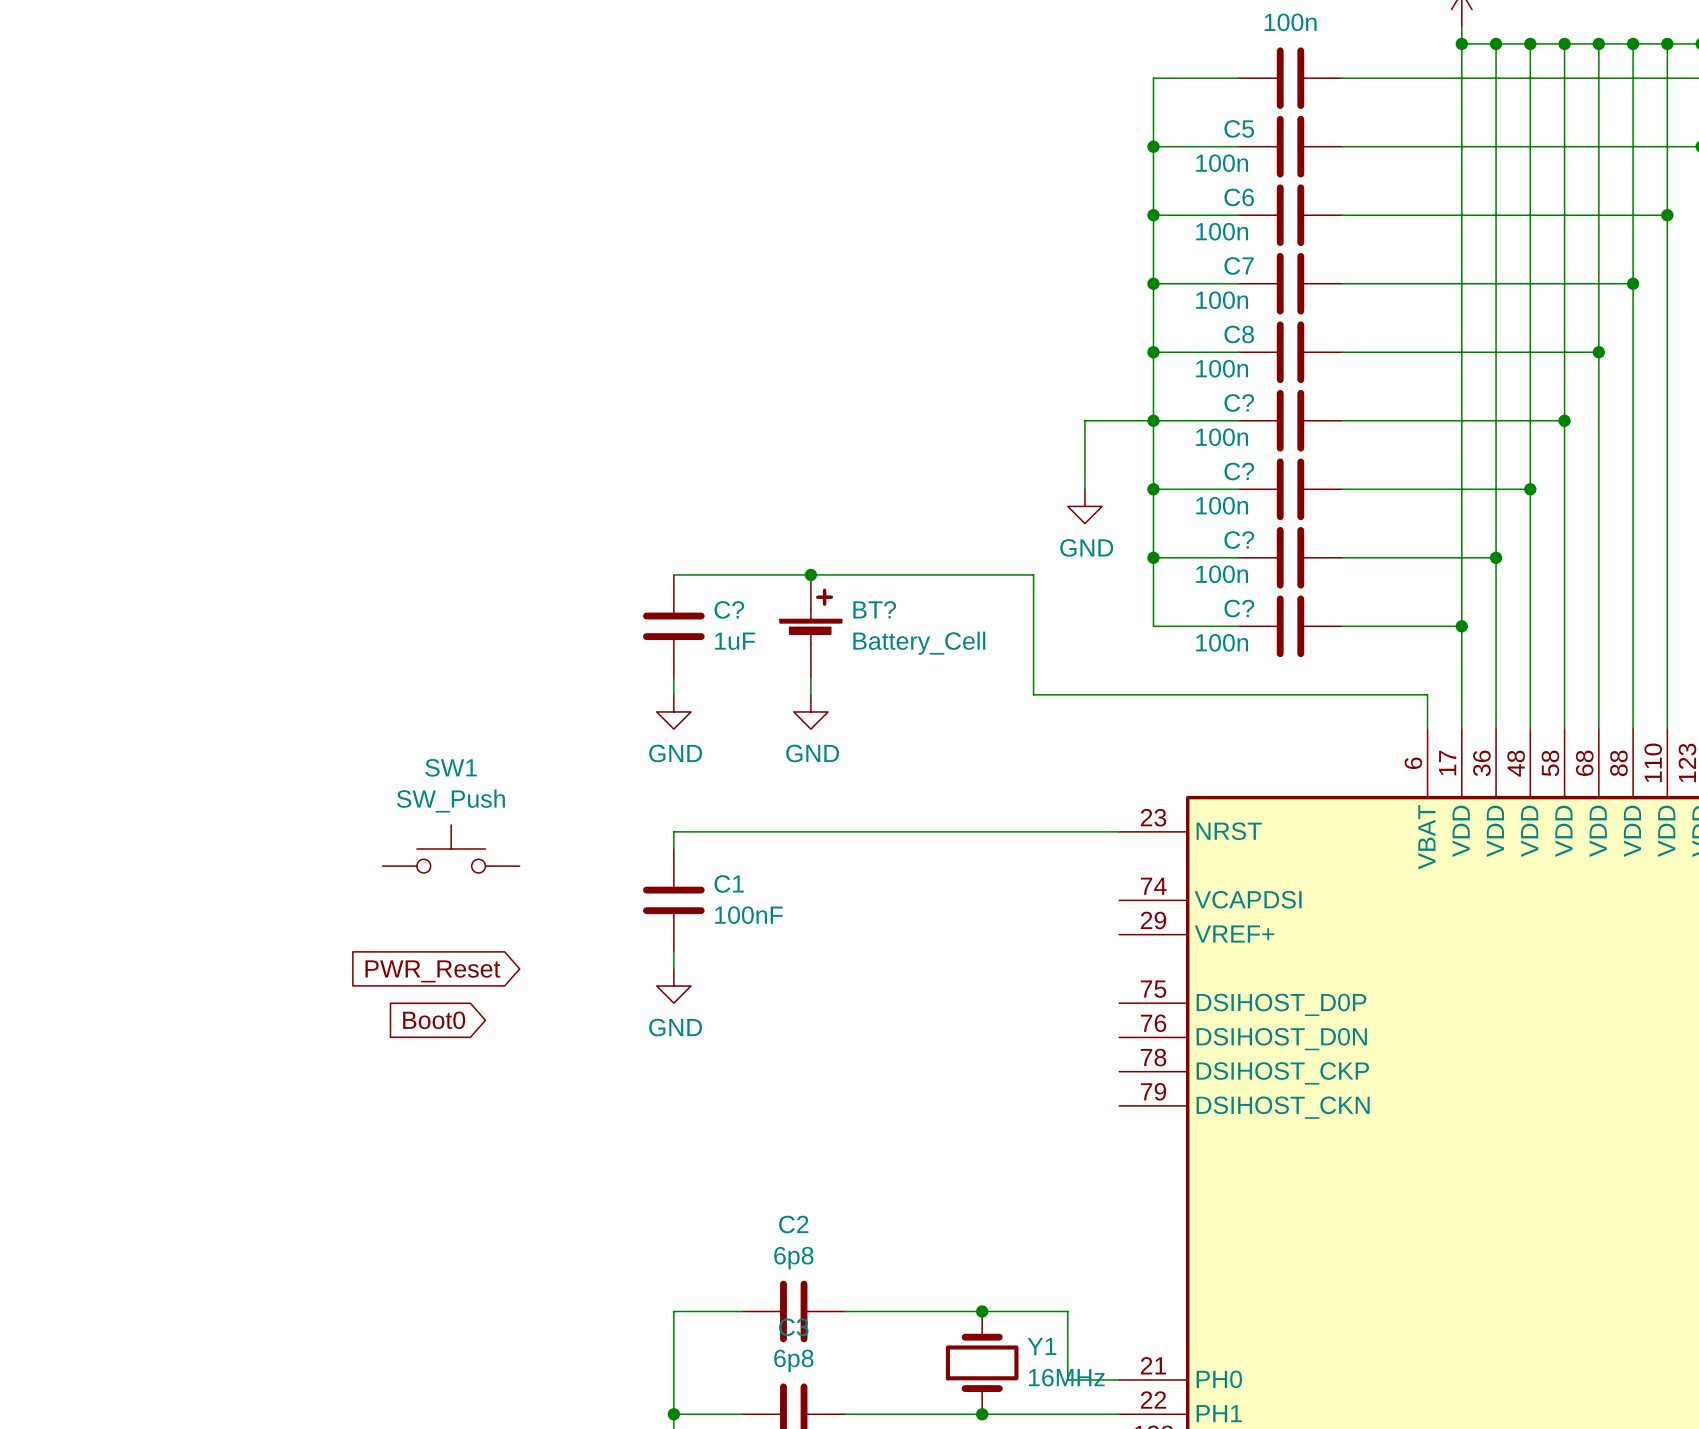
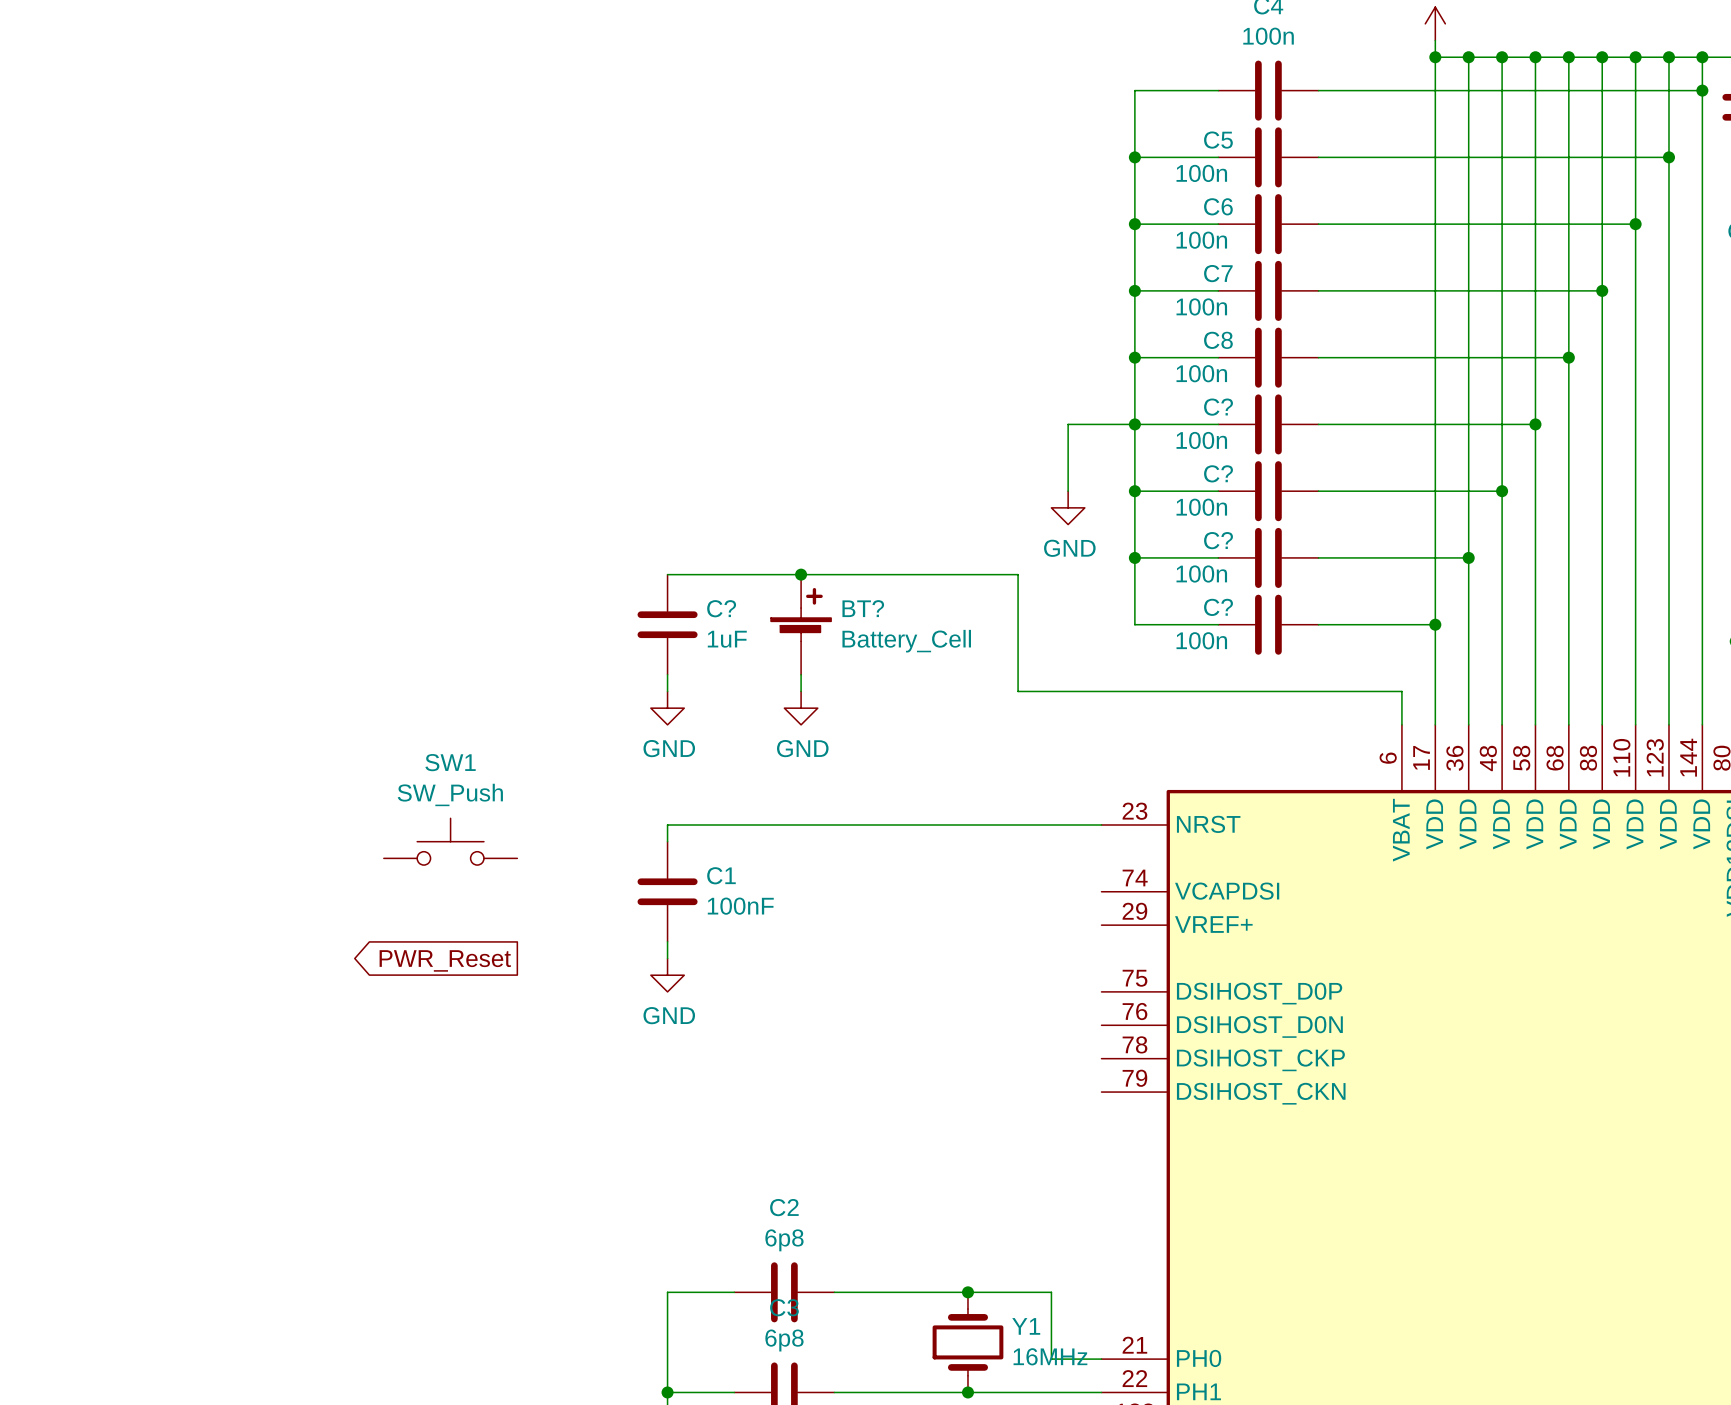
global label shape: input (432, 971) -> output (445, 960)
global label: Boot0 (434, 1020) -> none

